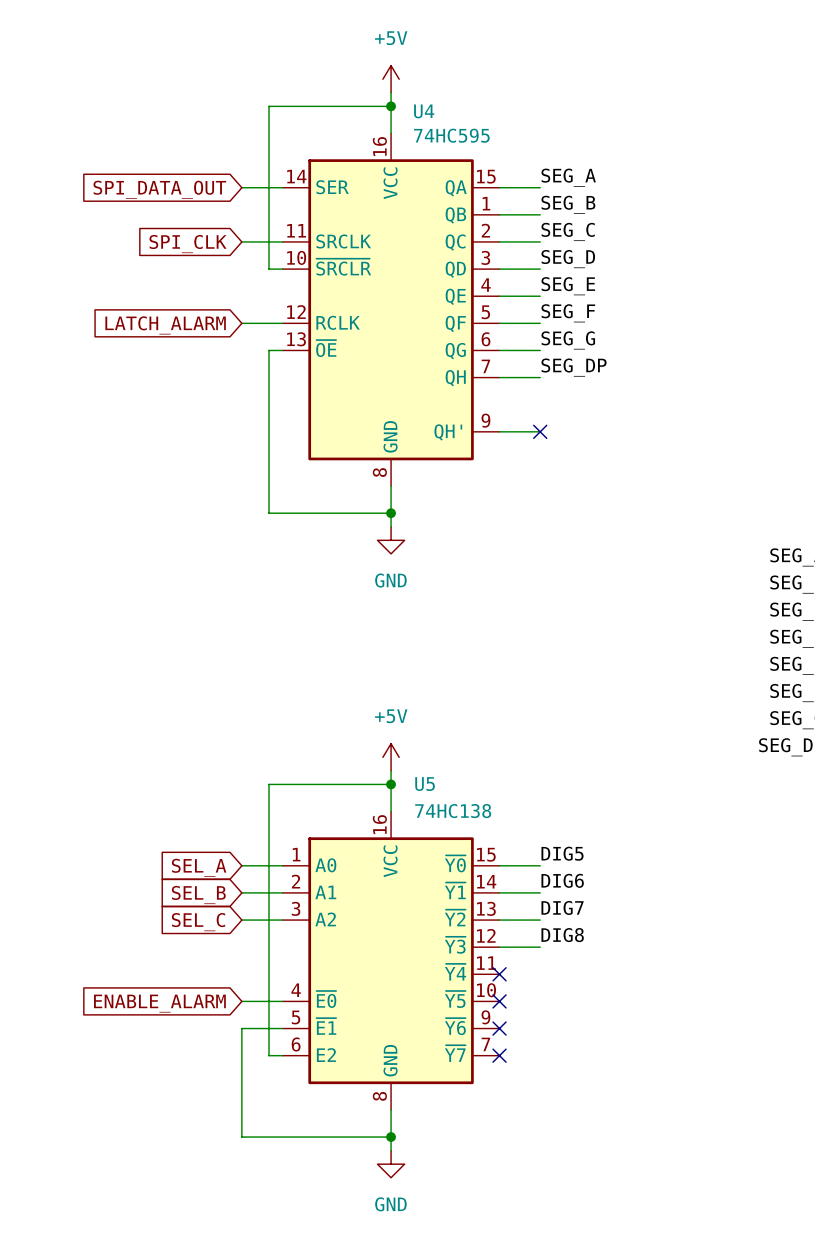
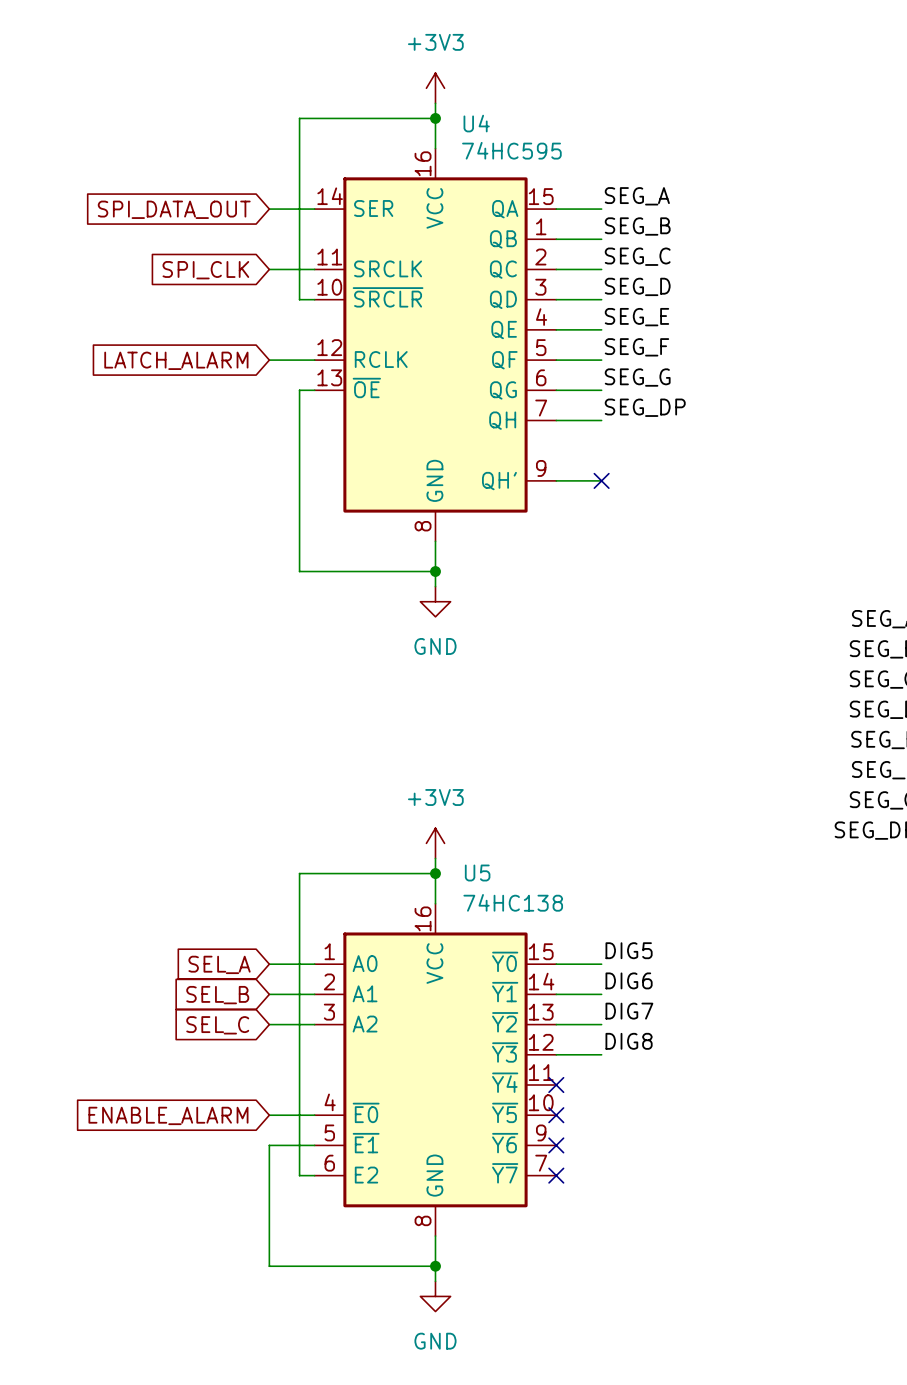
power symbol: +5V (391, 79) -> +3V3 (435, 88)
power symbol: +5V (391, 757) -> +3V3 (435, 843)

